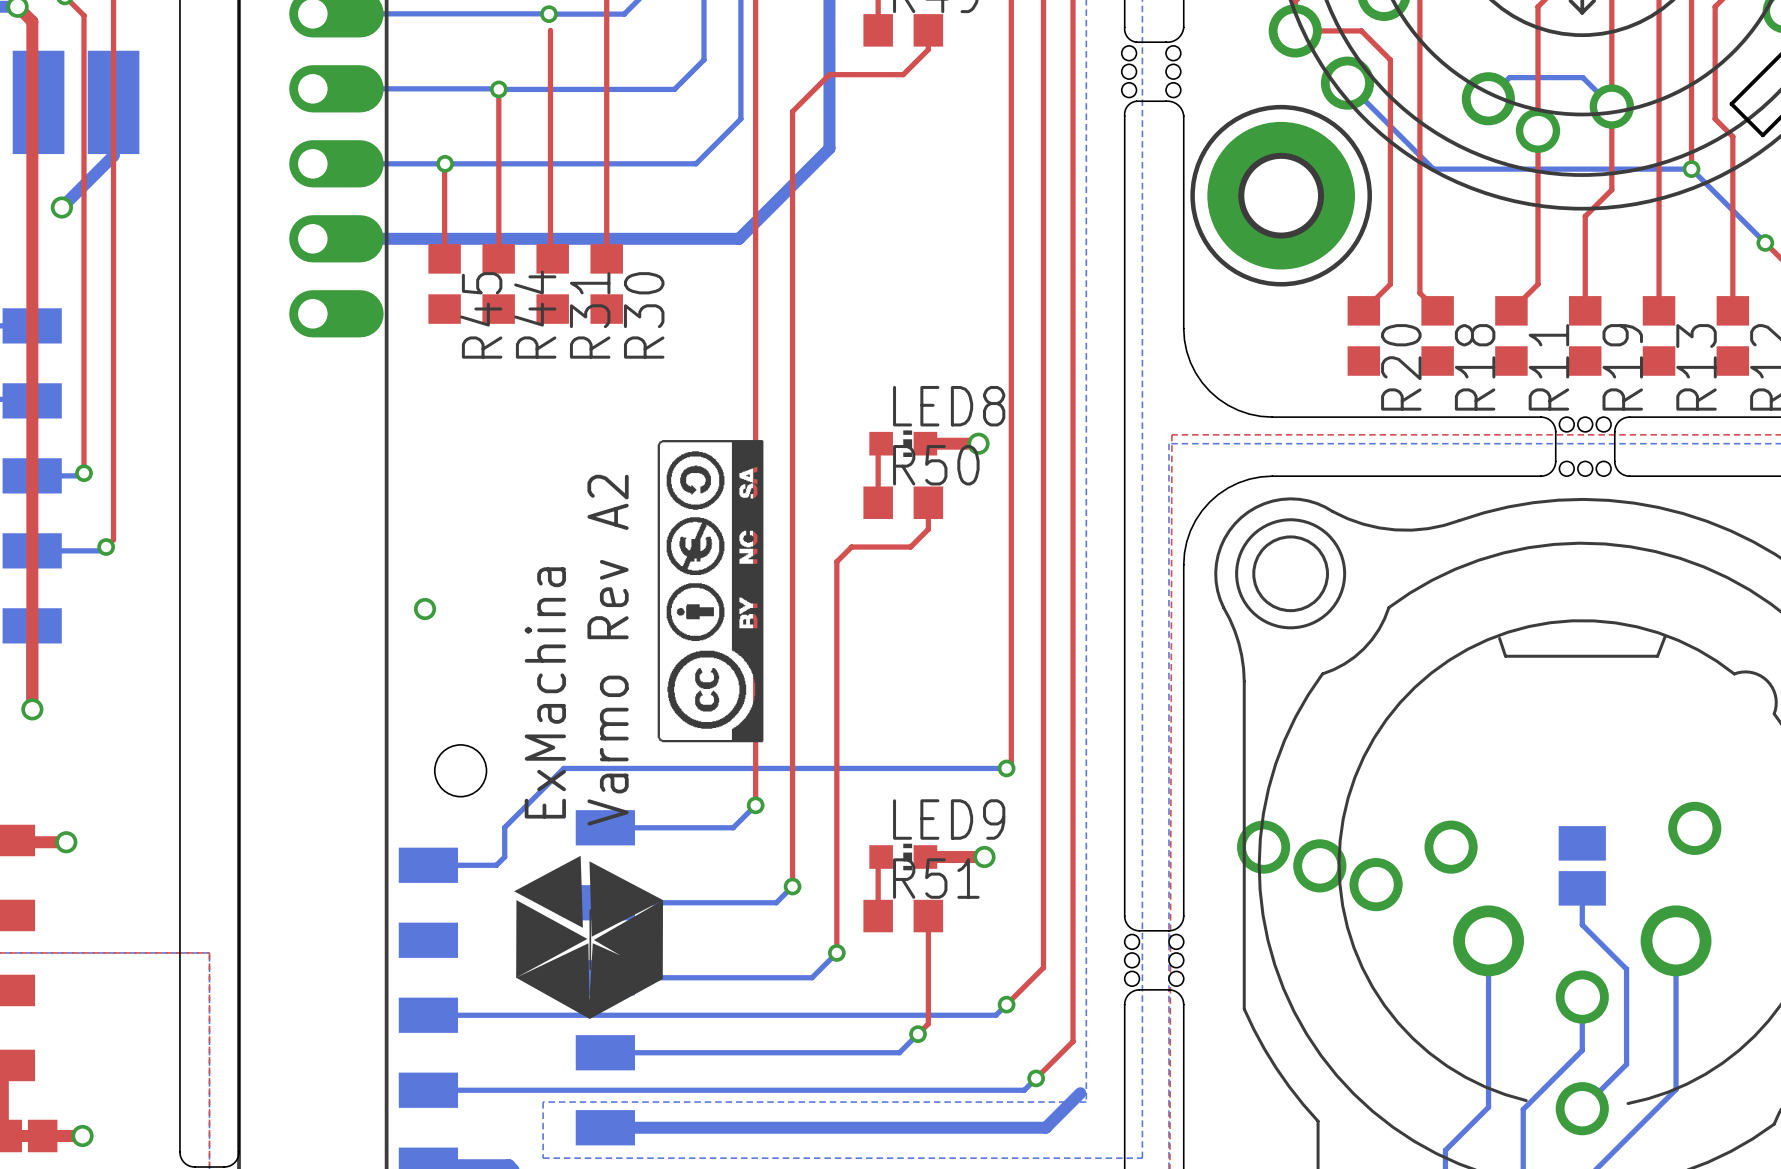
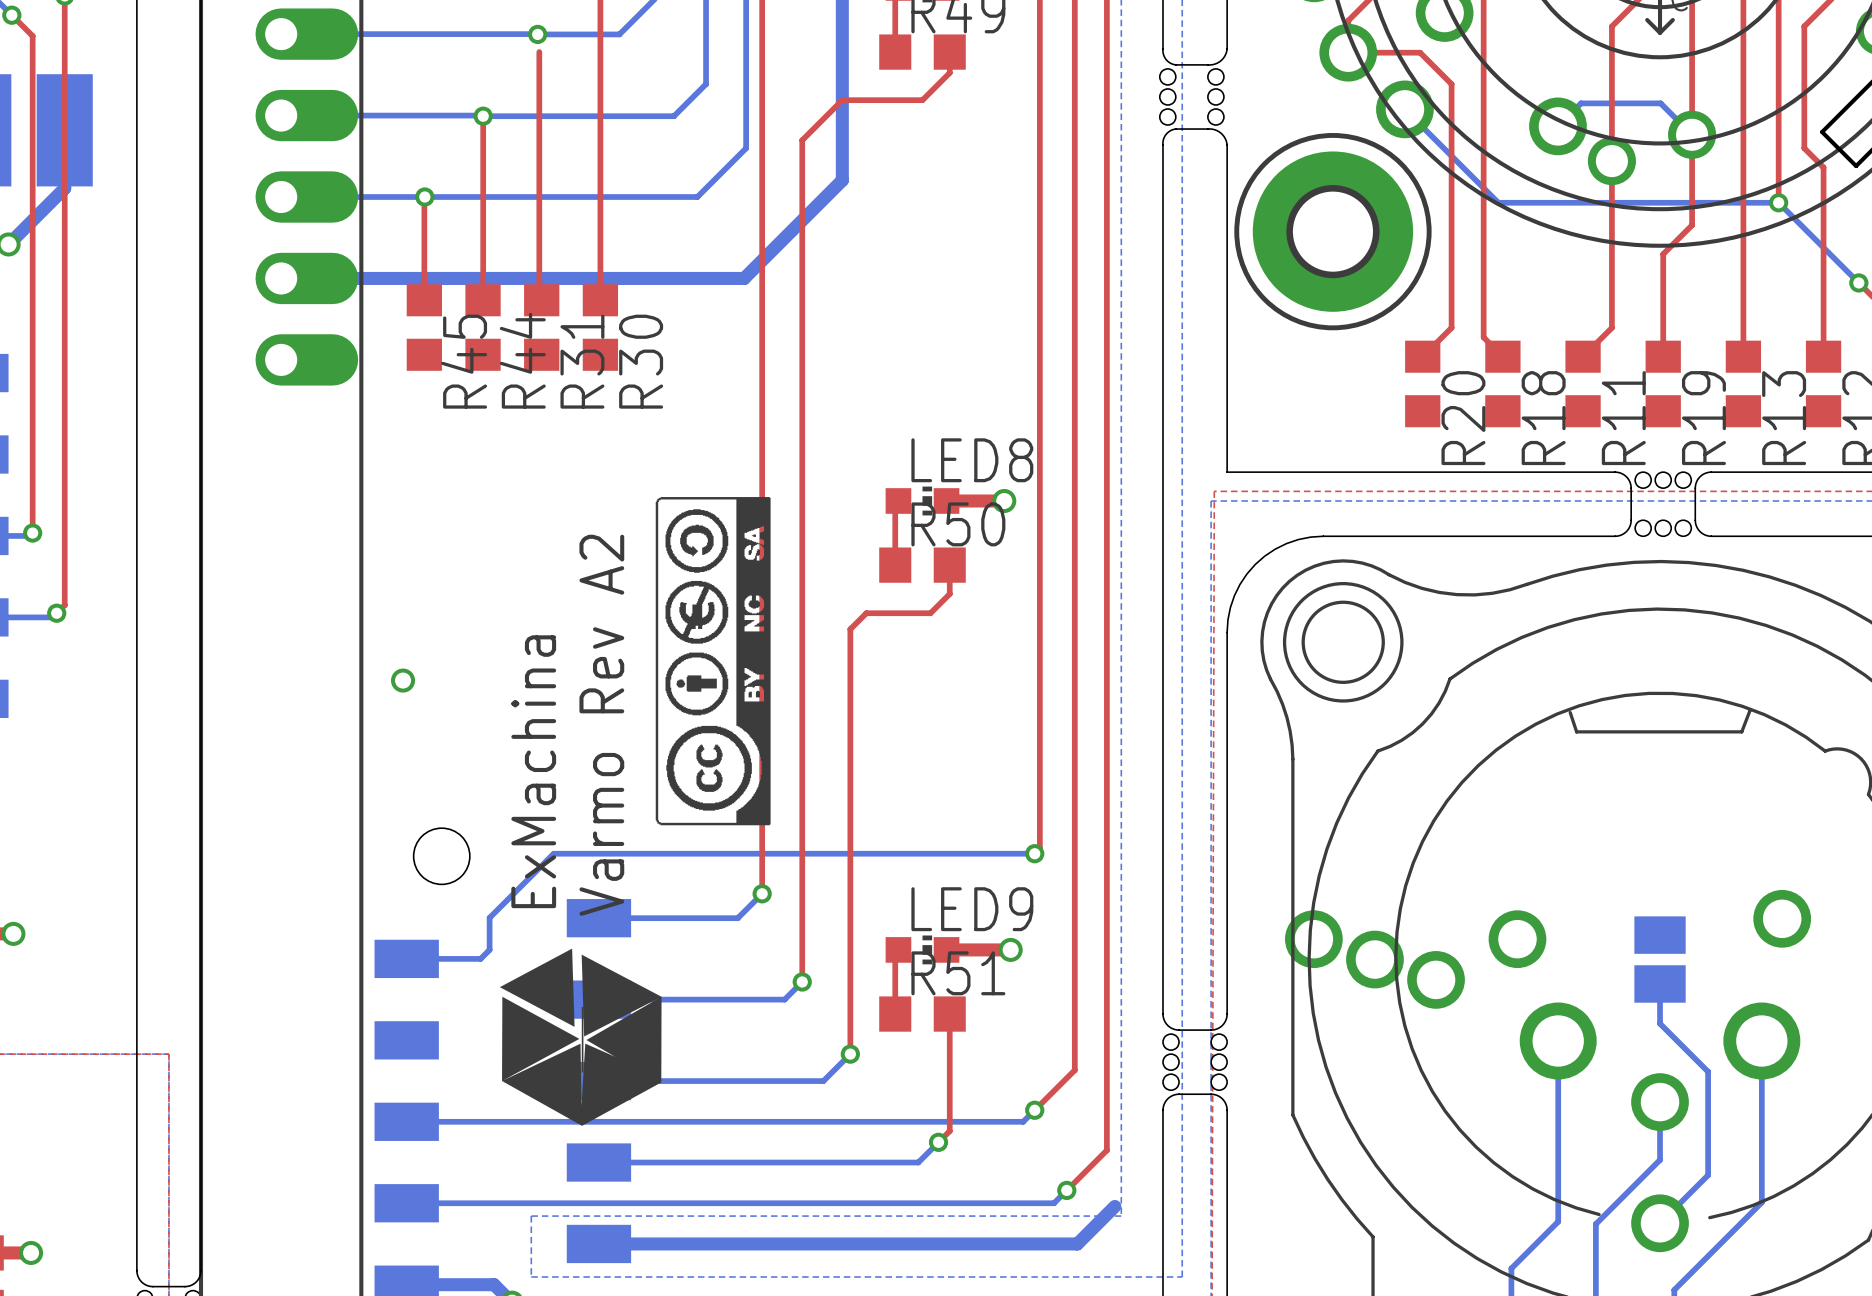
board edge: (1183, 328) (1186, 351) (1190, 362) (1202, 382) (1209, 391) (1218, 398) (1238, 410) (1249, 414) (1272, 417) -> (1227, 375) (1227, 472) (1323, 472)

